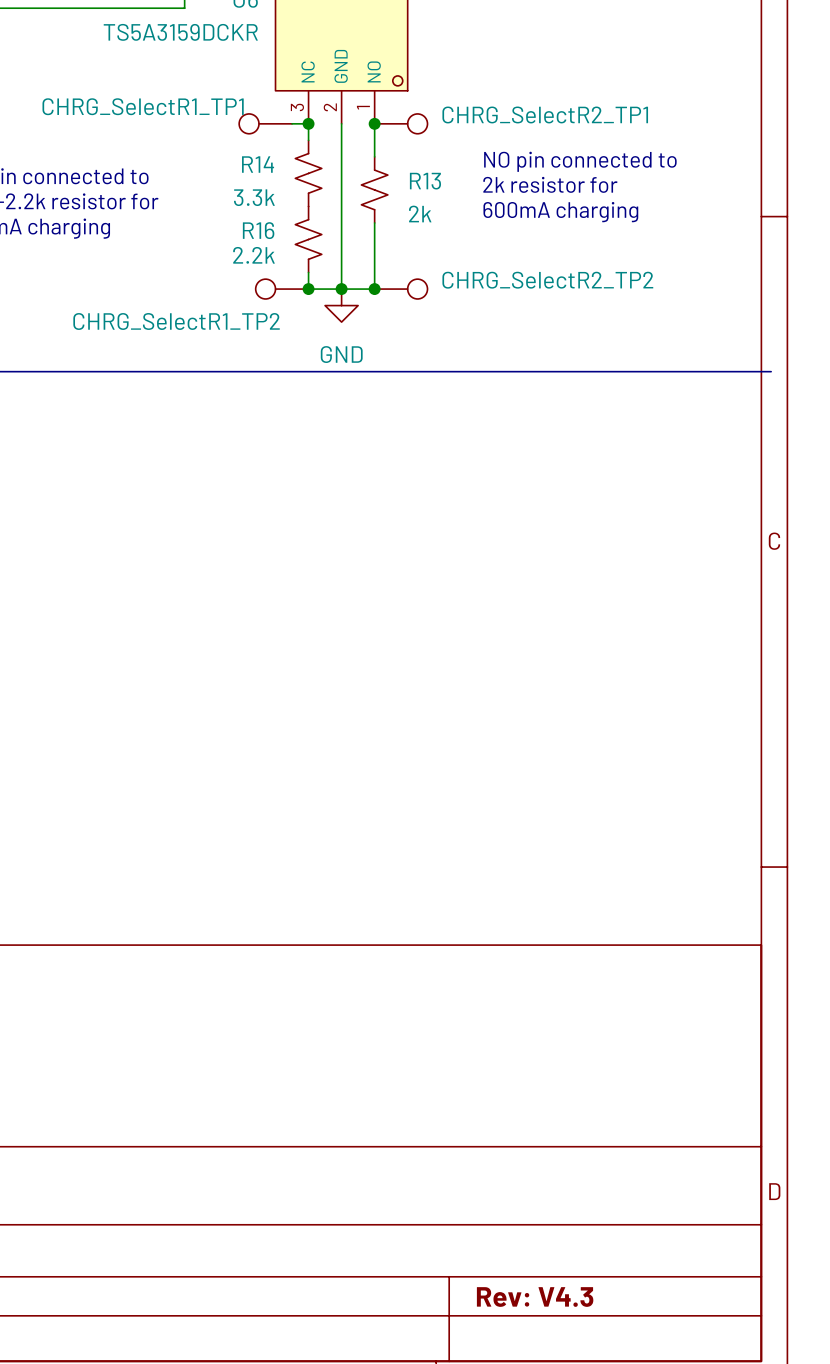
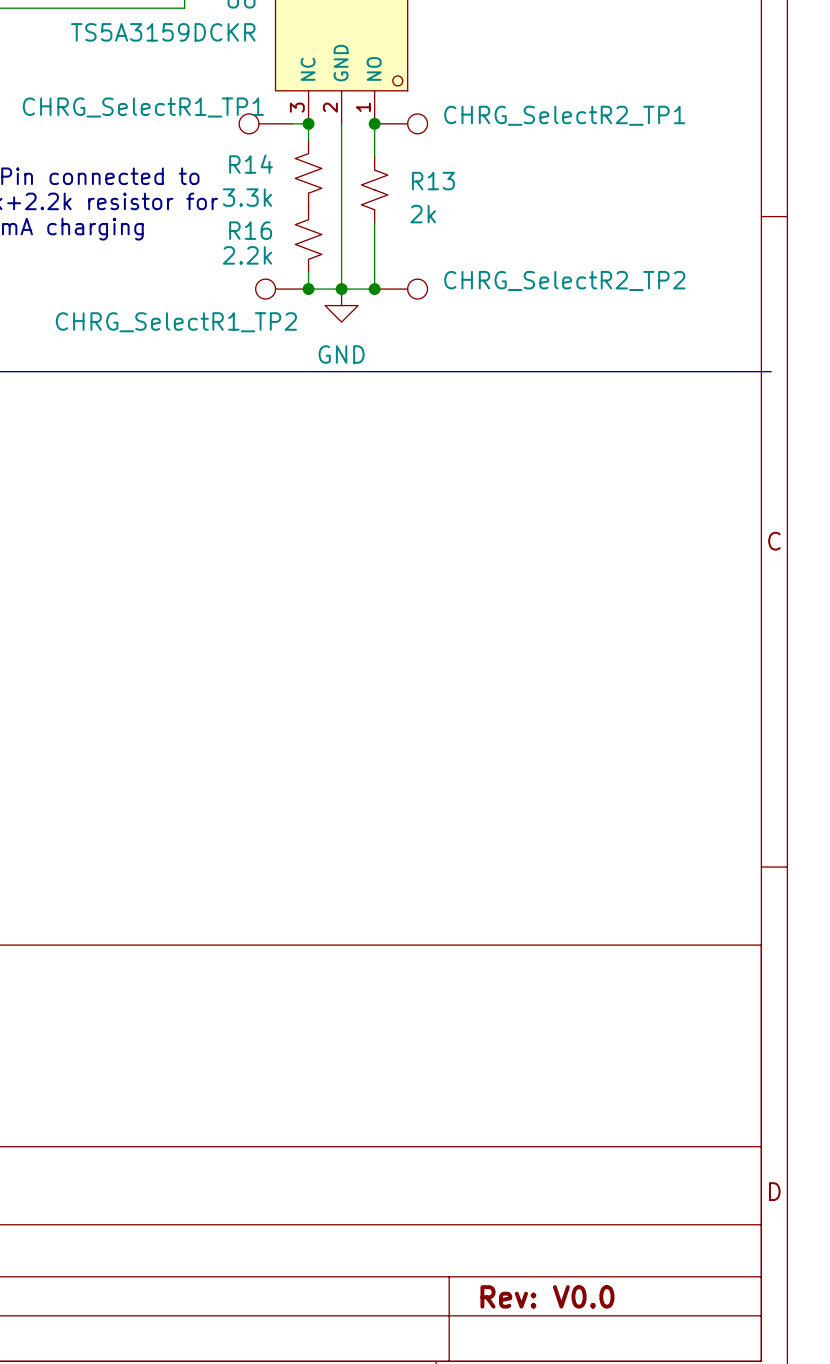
text: NO pin connected to (580, 161) -> none
text: 2k resistor for (550, 184) -> none
text: 600mA charging (560, 212) -> none
title block: Rev: V4.3 (535, 1297) -> Rev: V0.0 (547, 1296)

